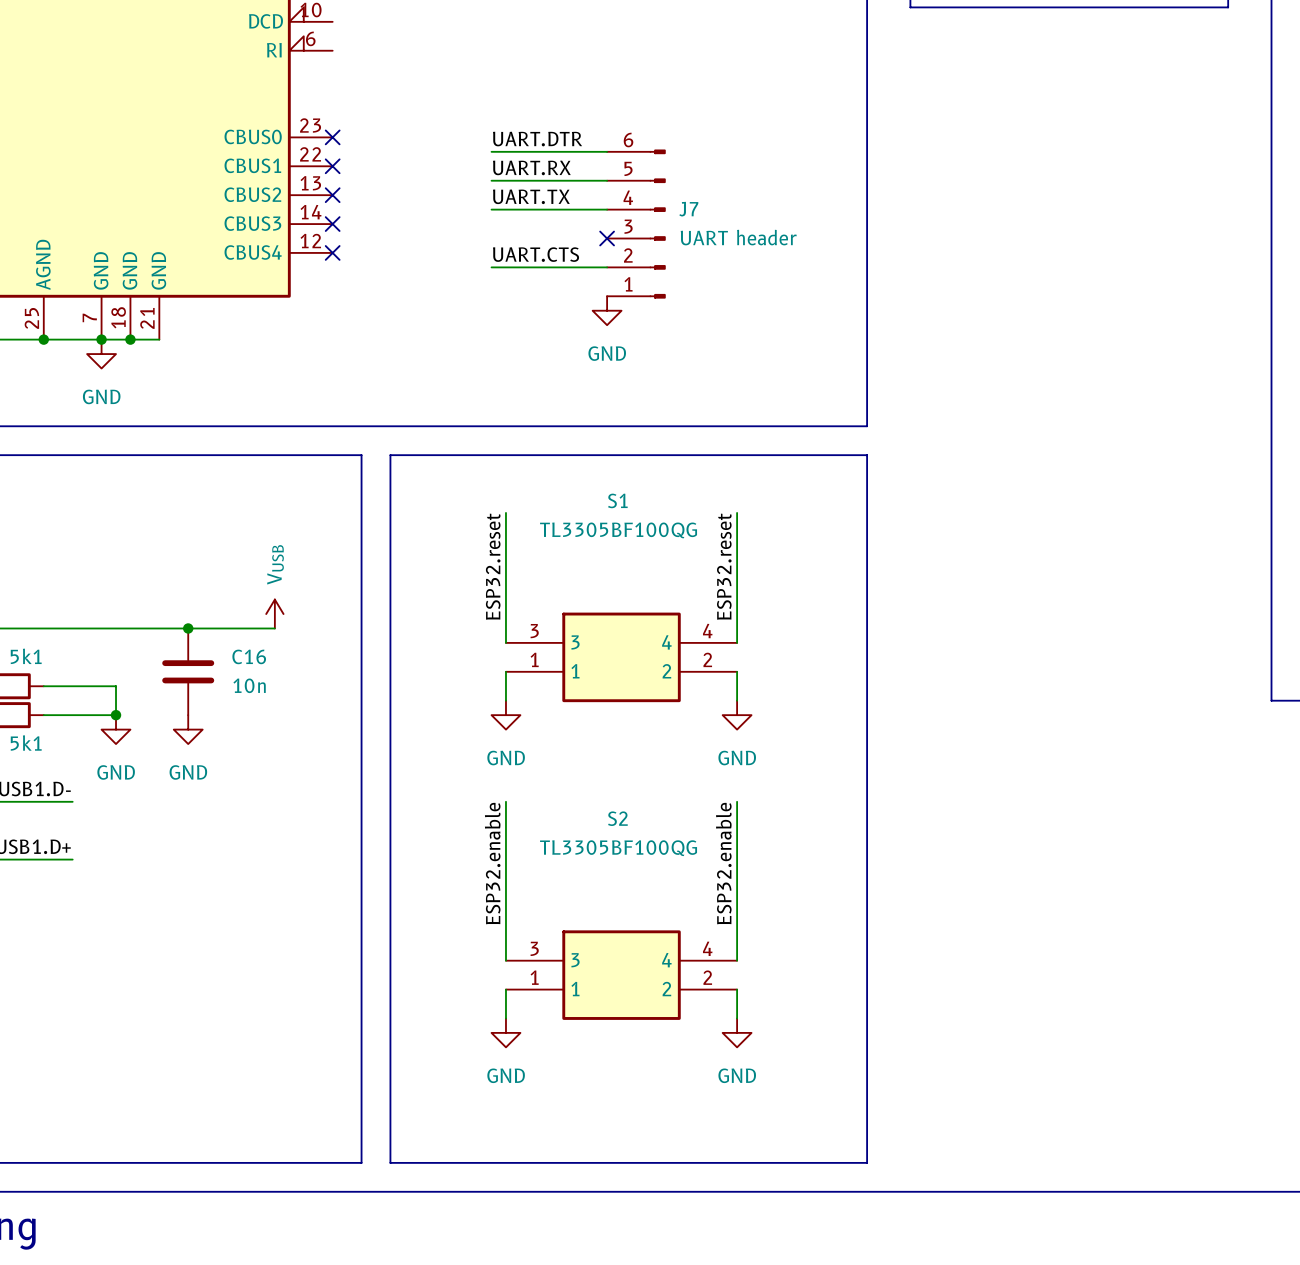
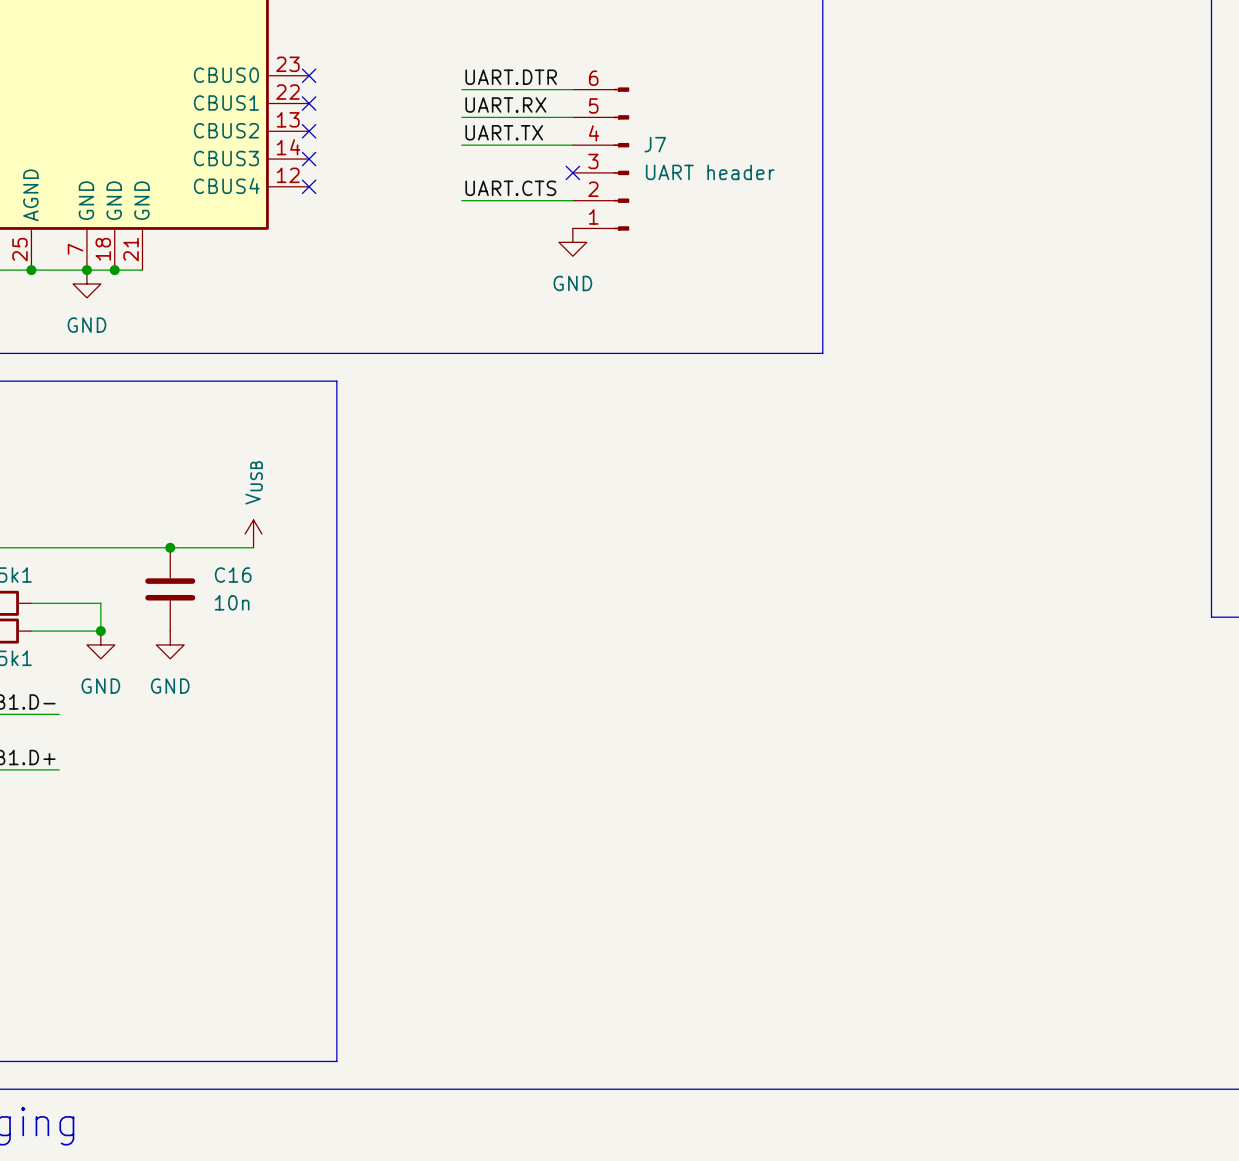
line: (390, 455) (867, 455) (867, 1162) (390, 1162) (390, 455) -> none
wire: (505, 512) (505, 642) -> none
wire: (737, 512) (737, 642) -> none
label: ESP32.reset (493, 566) -> none
label: ESP32.reset (724, 566) -> none
S1: TL3305BF100QG (621, 657) -> none
wire: (505, 671) (505, 700) -> none
wire: (737, 671) (737, 700) -> none
power symbol: GND (505, 715) -> none
power symbol: GND (737, 715) -> none
wire: (505, 801) (505, 960) -> none
wire: (737, 801) (737, 960) -> none
label: ESP32.enable (492, 863) -> none
label: ESP32.enable (723, 863) -> none
S2: TL3305BF100QG (621, 975) -> none
wire: (505, 989) (505, 1018) -> none
wire: (737, 989) (737, 1018) -> none
power symbol: GND (505, 1032) -> none
power symbol: GND (737, 1032) -> none

